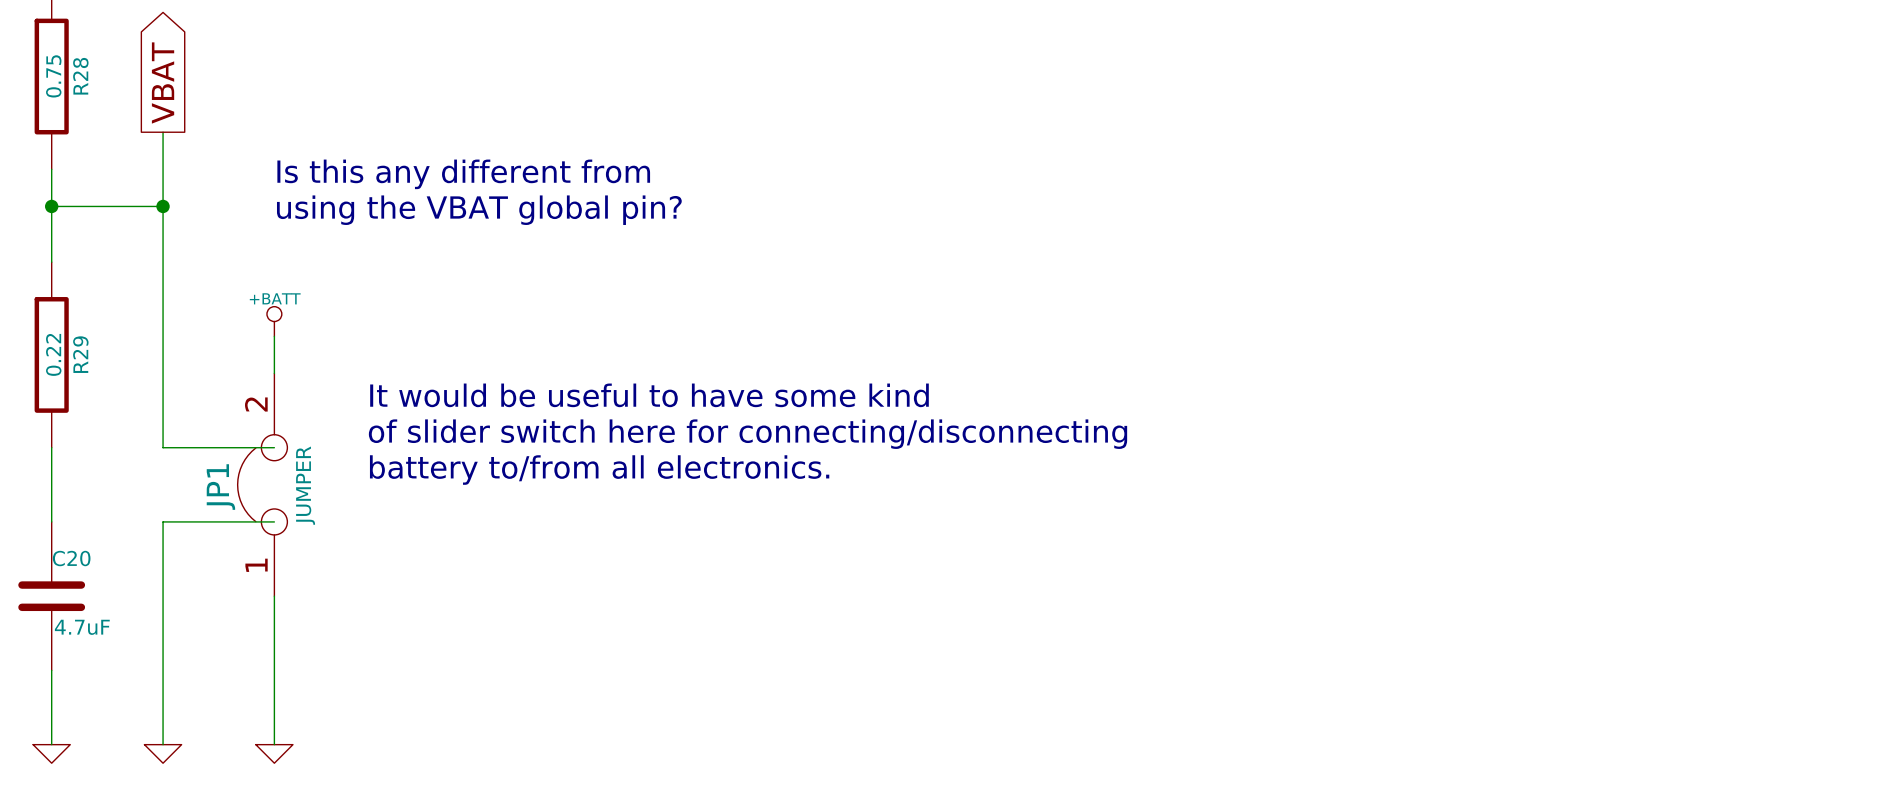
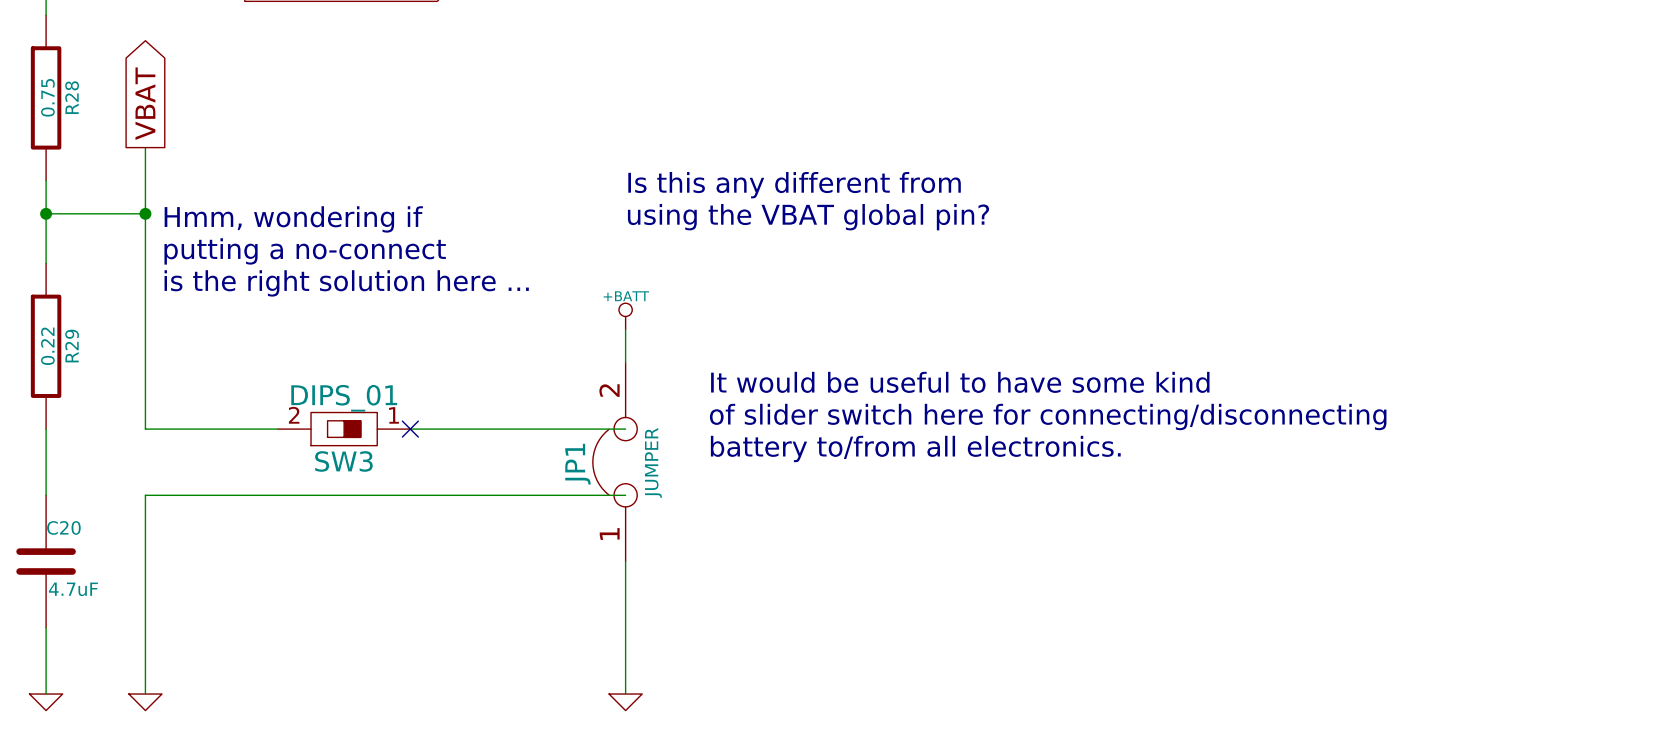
text: Is this any different from (463, 174) -> none
text: none -> Is this any different from (794, 185)
text: using the VBAT global pin? (479, 210) -> none
text: none -> using the VBAT global pin? (808, 217)
text: none -> Hmm, wondering if (293, 219)
text: none -> putting a no-connect (305, 251)
text: none -> is the right solution here ... (346, 283)
power symbol: +BATT (274, 321) -> none
power symbol: none -> +BATT (625, 316)
wire: (274, 336) (274, 373) -> none
wire: none -> (625, 329) (625, 362)
text: It would be useful to have some kind (649, 395) -> none
text: none -> It would be useful to have some kind (960, 382)
text: of slider switch here for connecting/disconnecting (748, 434) -> none
text: none -> of slider switch here for connecting/disconnecting (1048, 417)
wire: none -> (244, 429) (277, 429)
SW3: none -> DIPS_01 (344, 429)
wire: none -> (410, 429) (625, 429)
no-connect mark: none -> (410, 429)
text: battery to/from all electronics. (599, 470) -> none
text: none -> battery to/from all electronics. (915, 448)
JP1 position: (262, 484) -> (615, 462)
wire: none -> (244, 495) (625, 495)
wire: (274, 596) (274, 744) -> none
wire: none -> (625, 561) (625, 694)
power symbol: (274, 753) -> none
power symbol: none -> (625, 702)

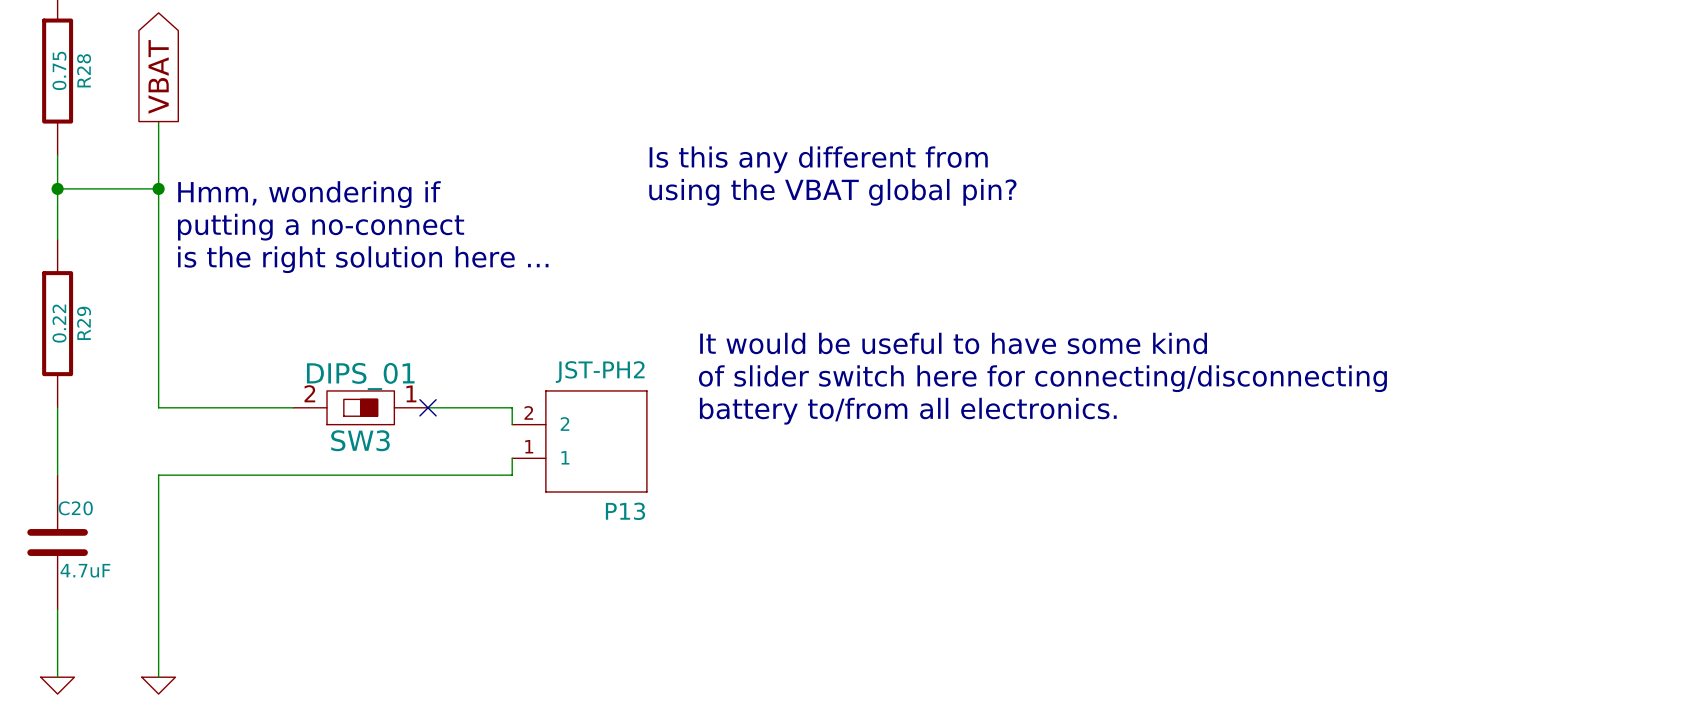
power symbol: +BATT (625, 316) -> none
wire: (625, 329) (625, 362) -> none
text position: It would be useful to have some kind (960, 382) -> It would be useful to have some kind (953, 343)
text position: of slider switch here for connecting/disconnecting (1048, 417) -> of slider switch here for connecting/disconnecting (1042, 378)
wire: (493, 429) (625, 429) -> (512, 407) (512, 424)
text position: battery to/from all electronics. (915, 448) -> battery to/from all electronics. (908, 411)
P13: none -> JST-PH2 (579, 441)
JP1: JUMPER (615, 462) -> none
wire: (493, 495) (625, 495) -> (512, 475) (512, 458)
wire: (625, 561) (625, 694) -> none
power symbol: (625, 702) -> none

